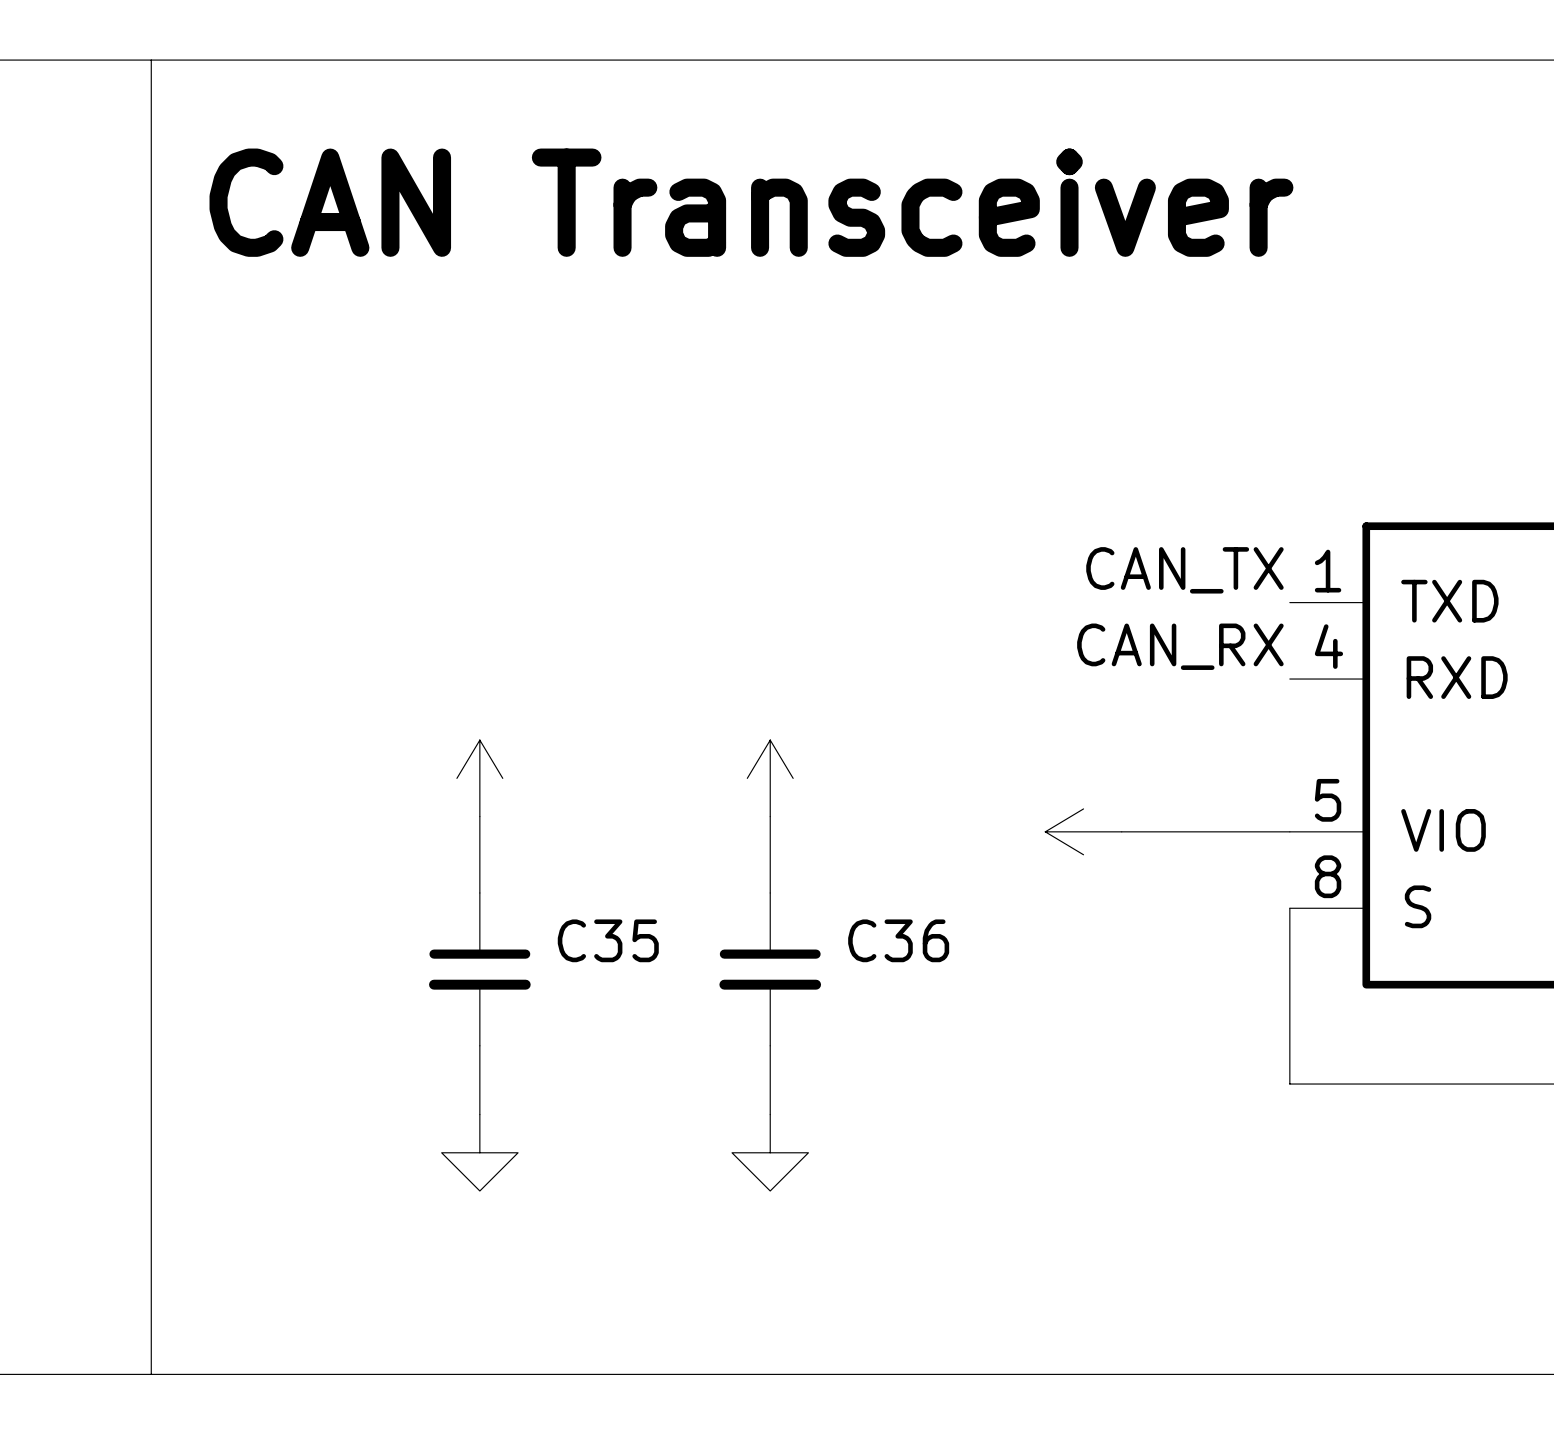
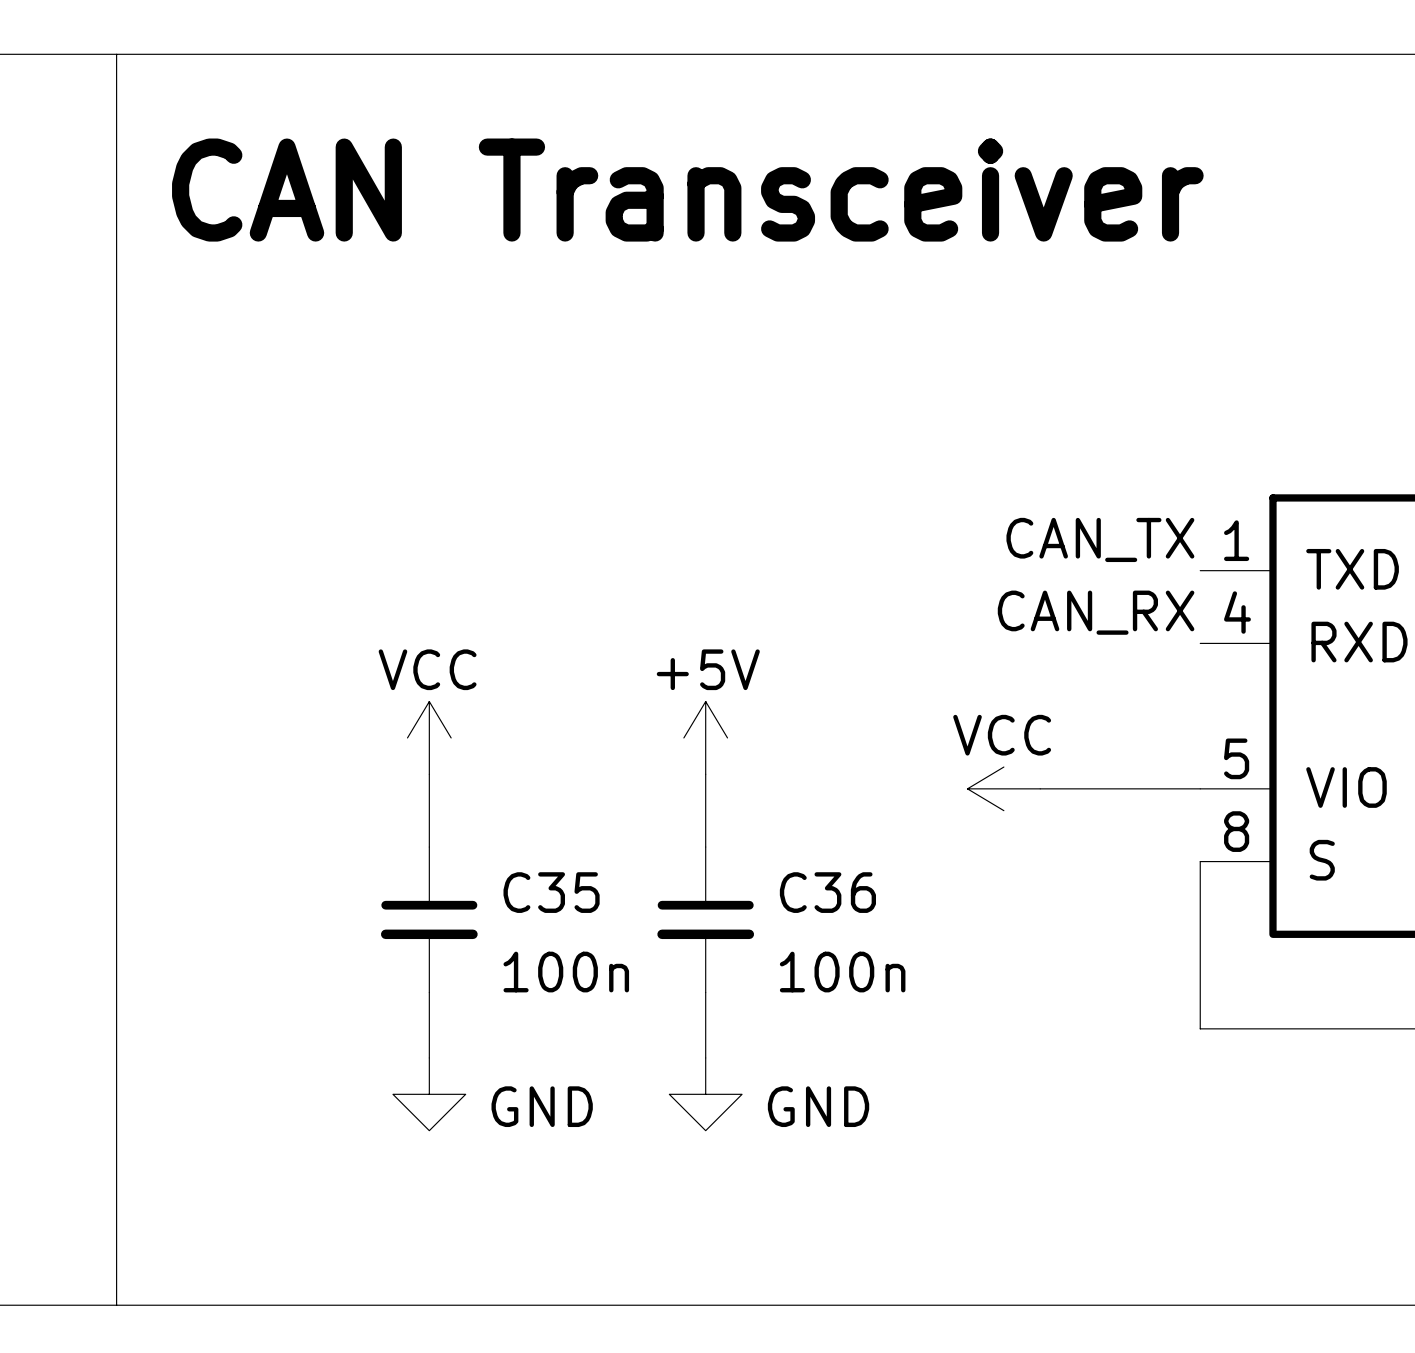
power symbol text: none -> VCC (427, 669)
power symbol text: none -> +5V (708, 669)
power symbol text: none -> VCC (1002, 735)
C35 value: none -> 100n (566, 972)
C36 value: none -> 100n (842, 972)
power symbol text: none -> GND (542, 1106)
power symbol text: none -> GND (818, 1106)

